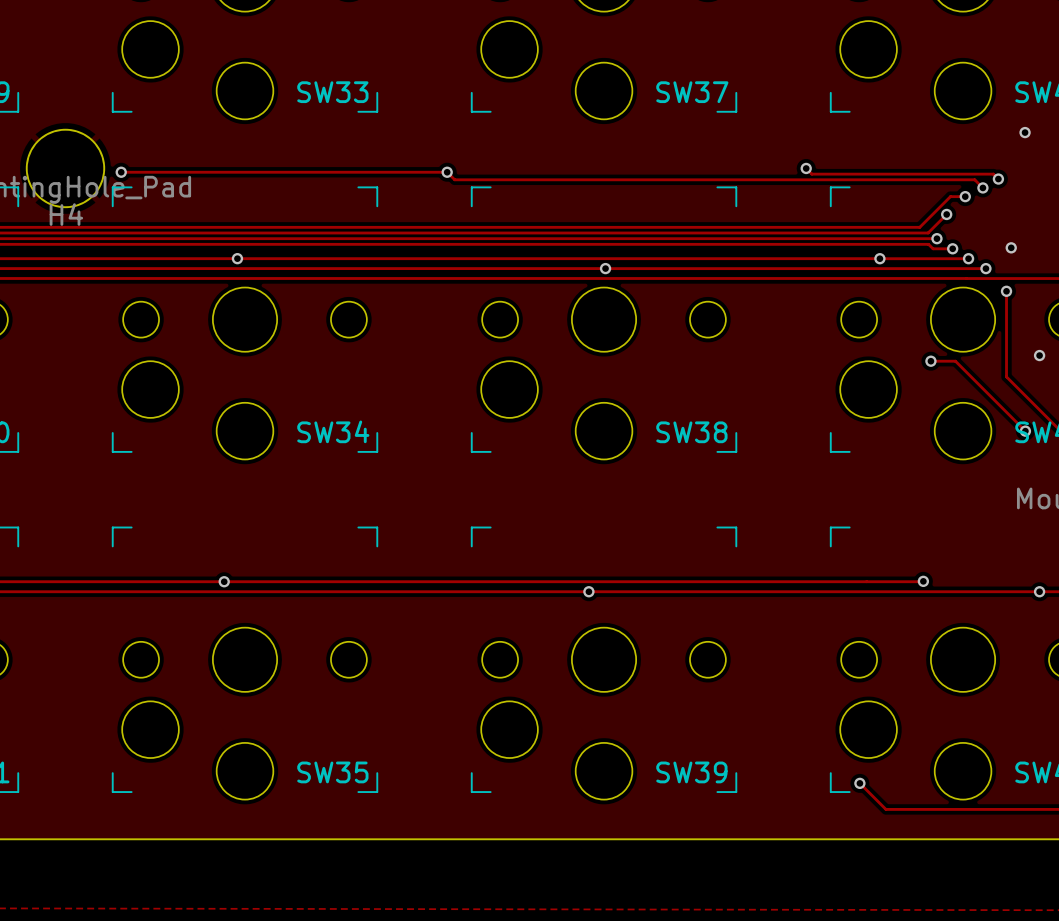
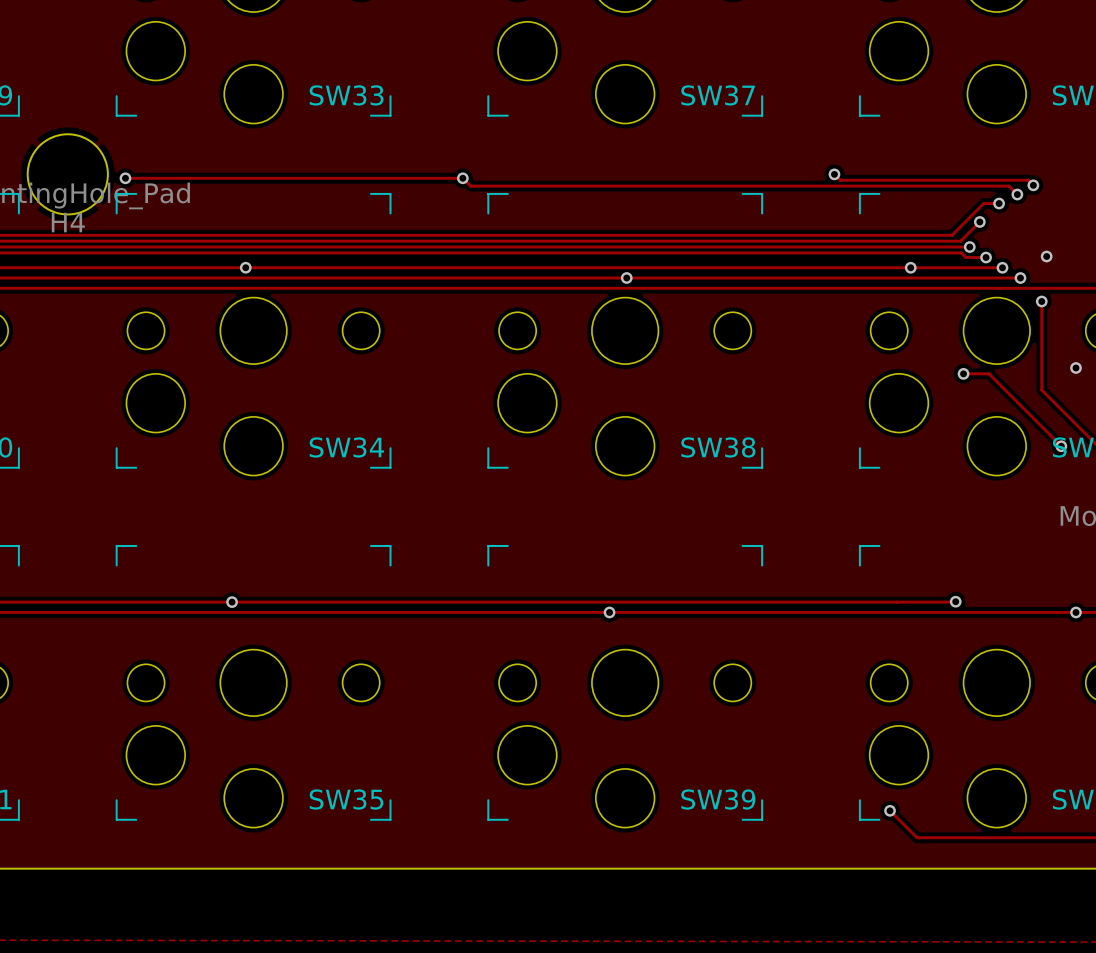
via: (1025, 132) -> none

